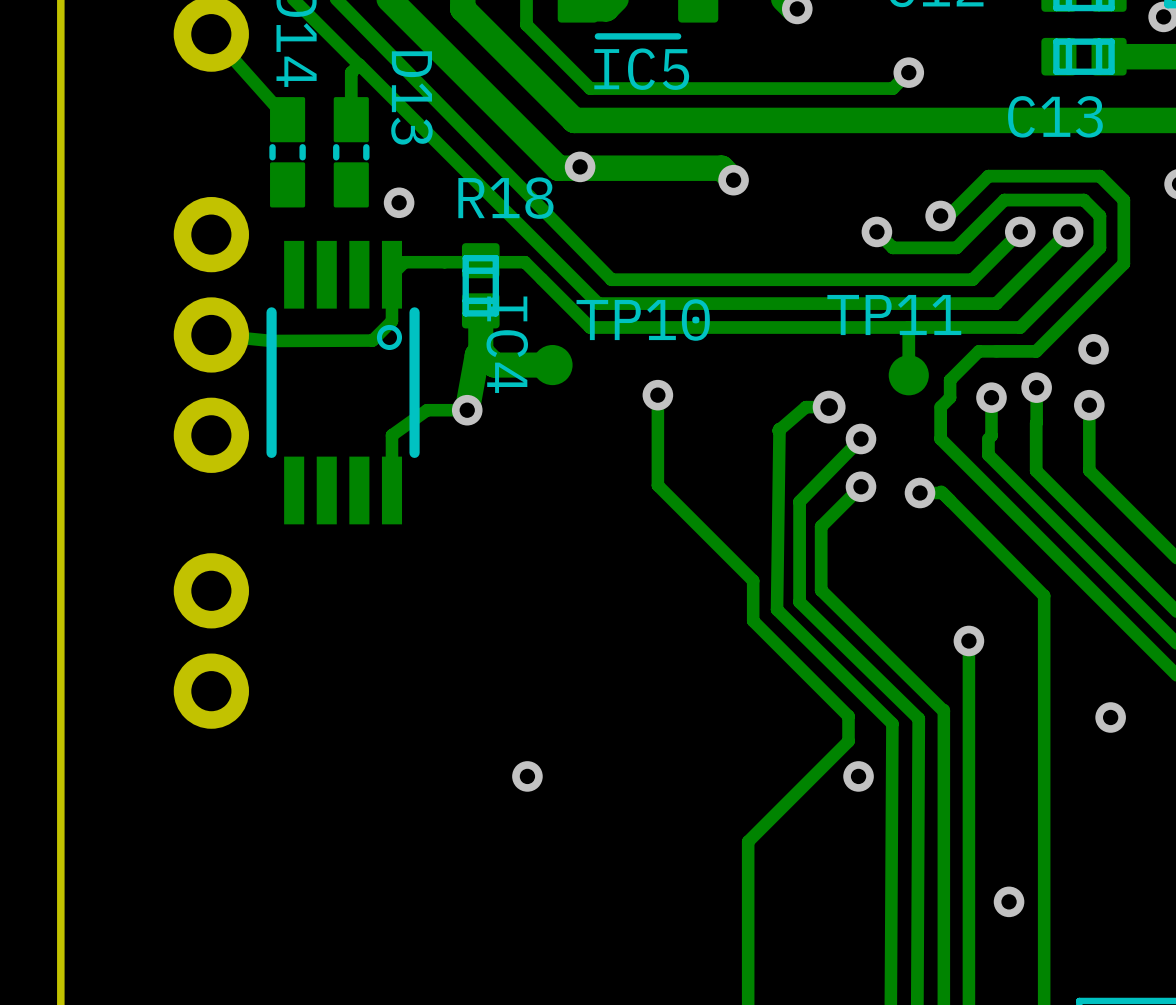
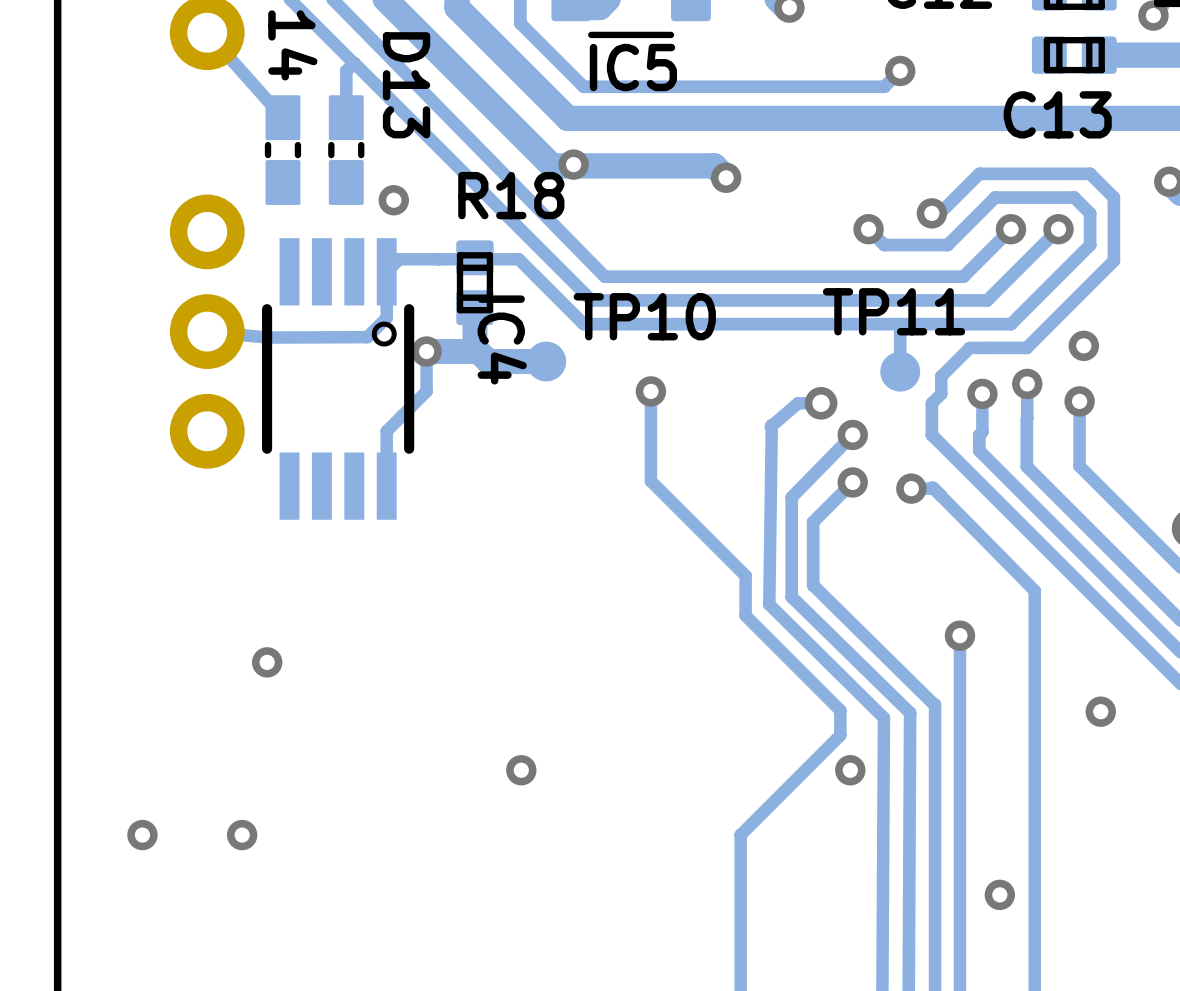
track: (477, 355) (467, 410) (427, 410) (391, 435) -> (471, 351) (426, 351) (426, 391) (386, 431)
via position: (467, 410) -> (426, 351)
part: (211, 640) -> none
via: none -> (267, 662)
via: none -> (142, 835)
via: none -> (242, 835)

